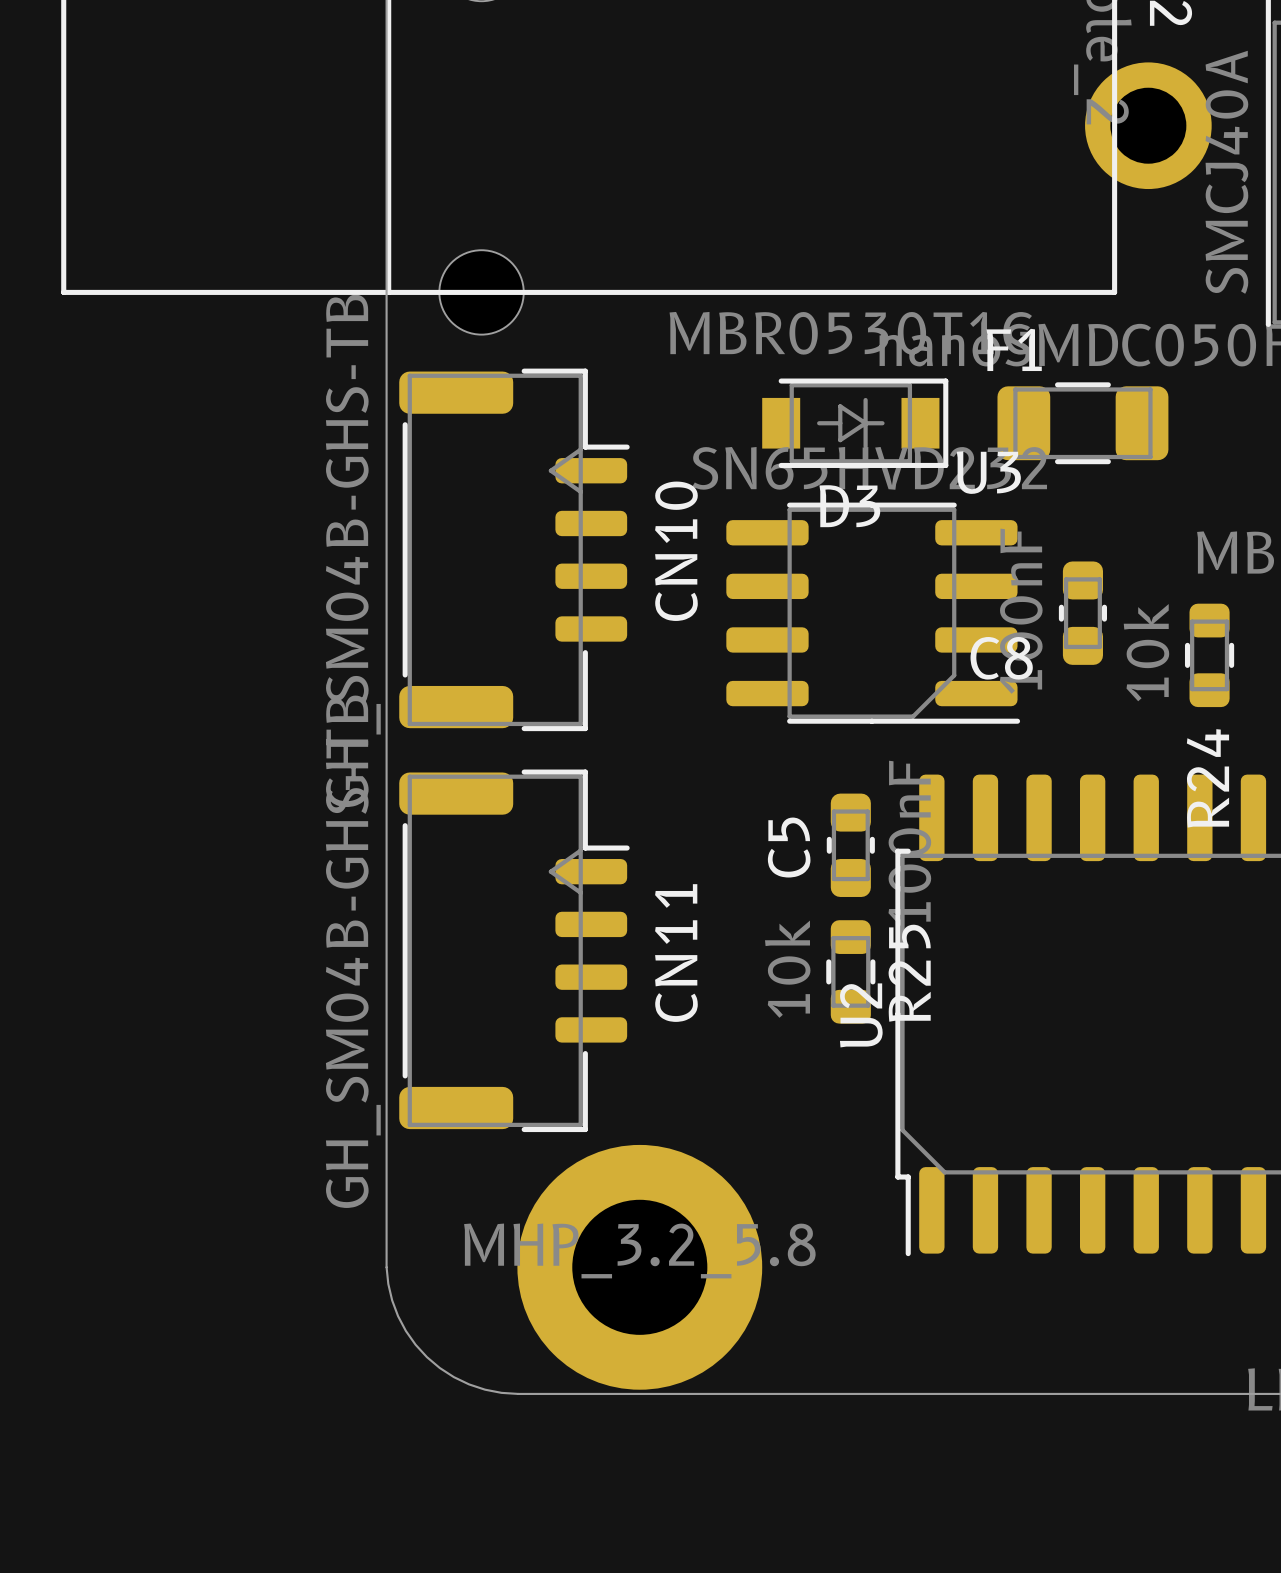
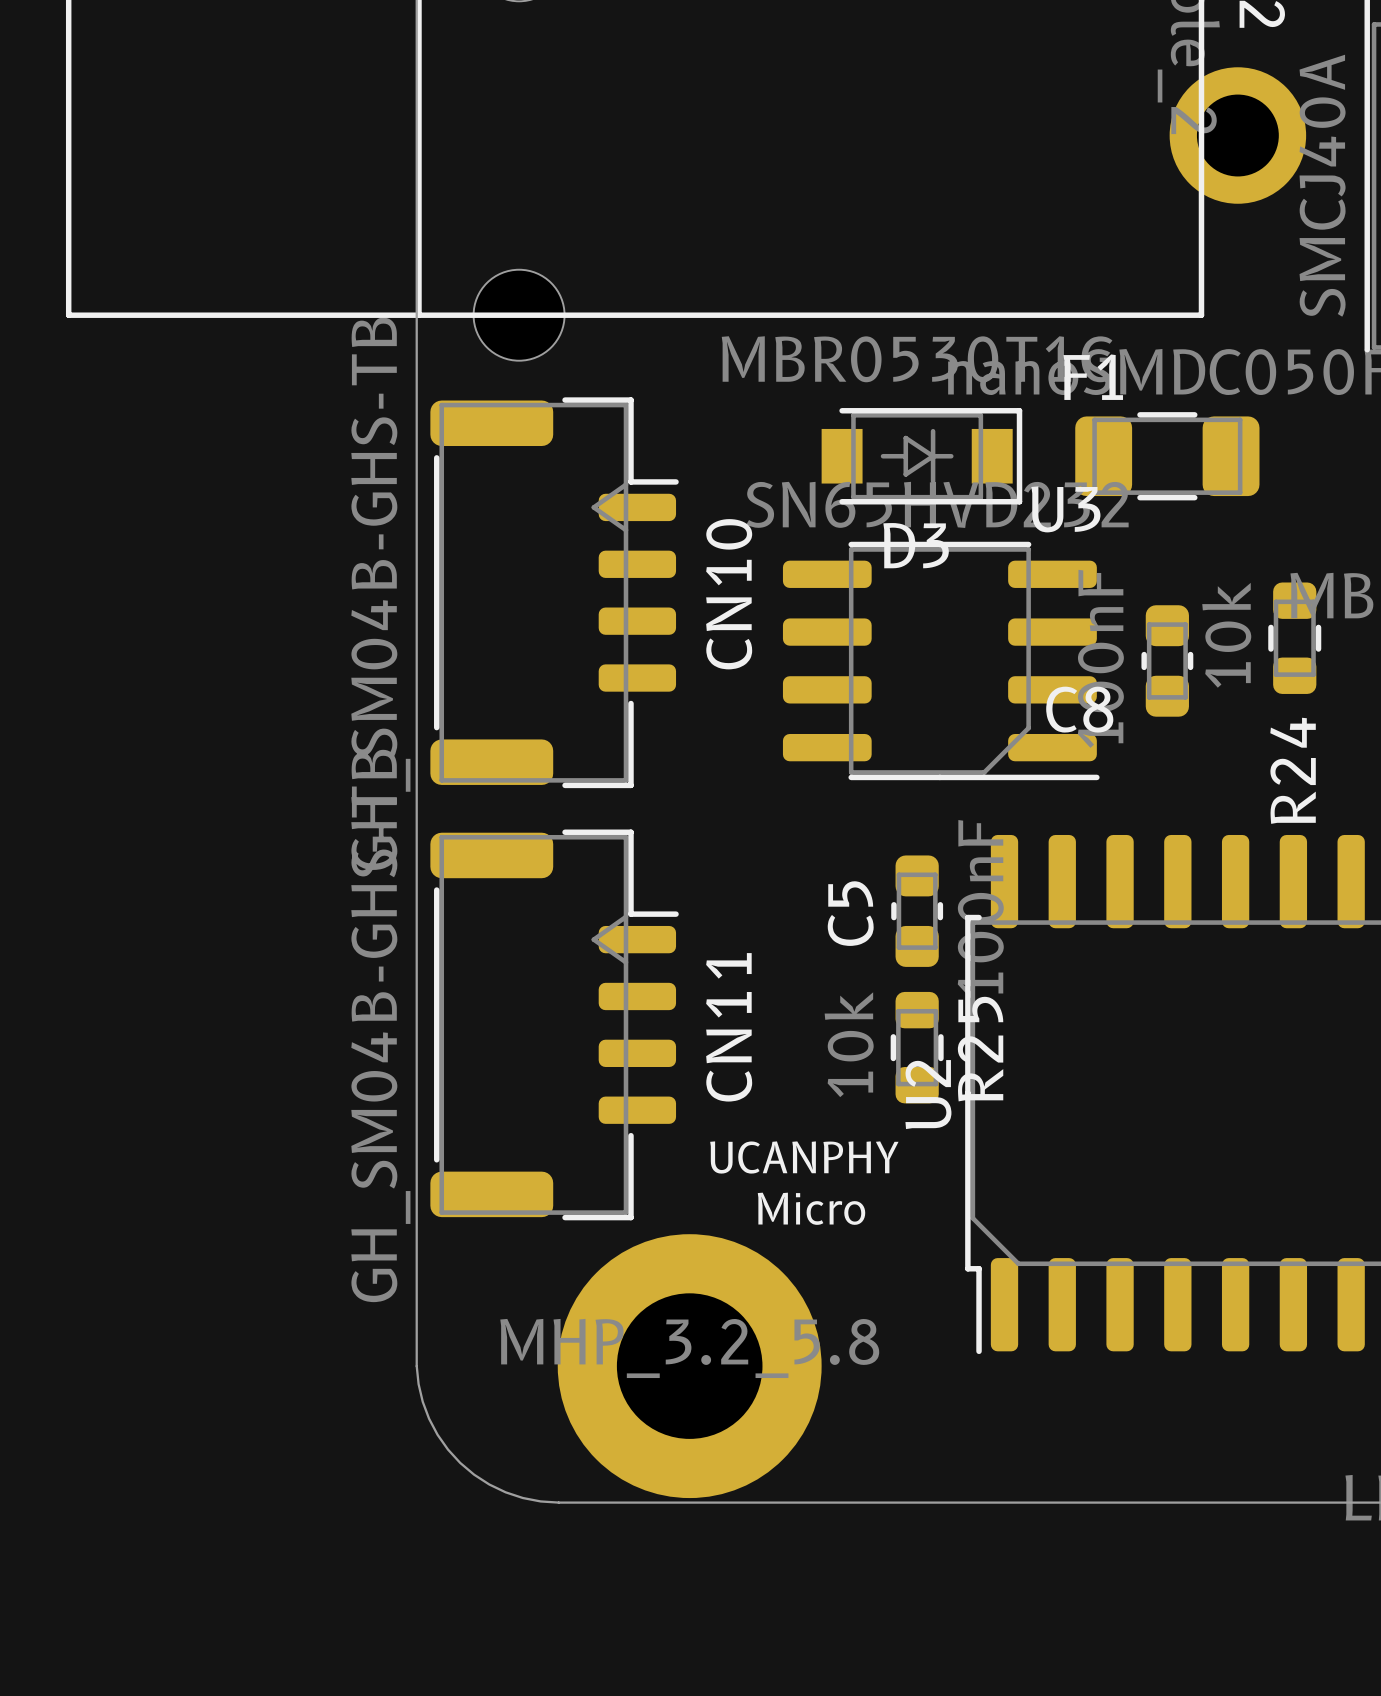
R24 position: (1209, 655) -> (1294, 638)
text: none -> UCANPHY (804, 1157)
text: none -> Micro (811, 1208)

